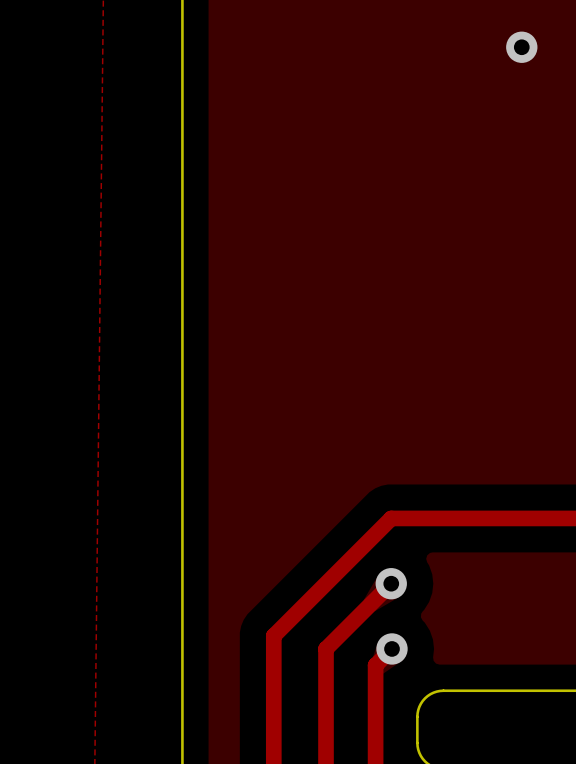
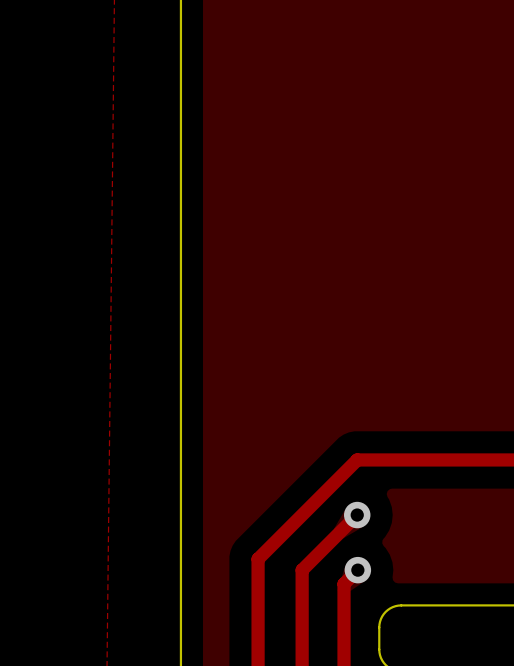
via: (521, 47) -> none

